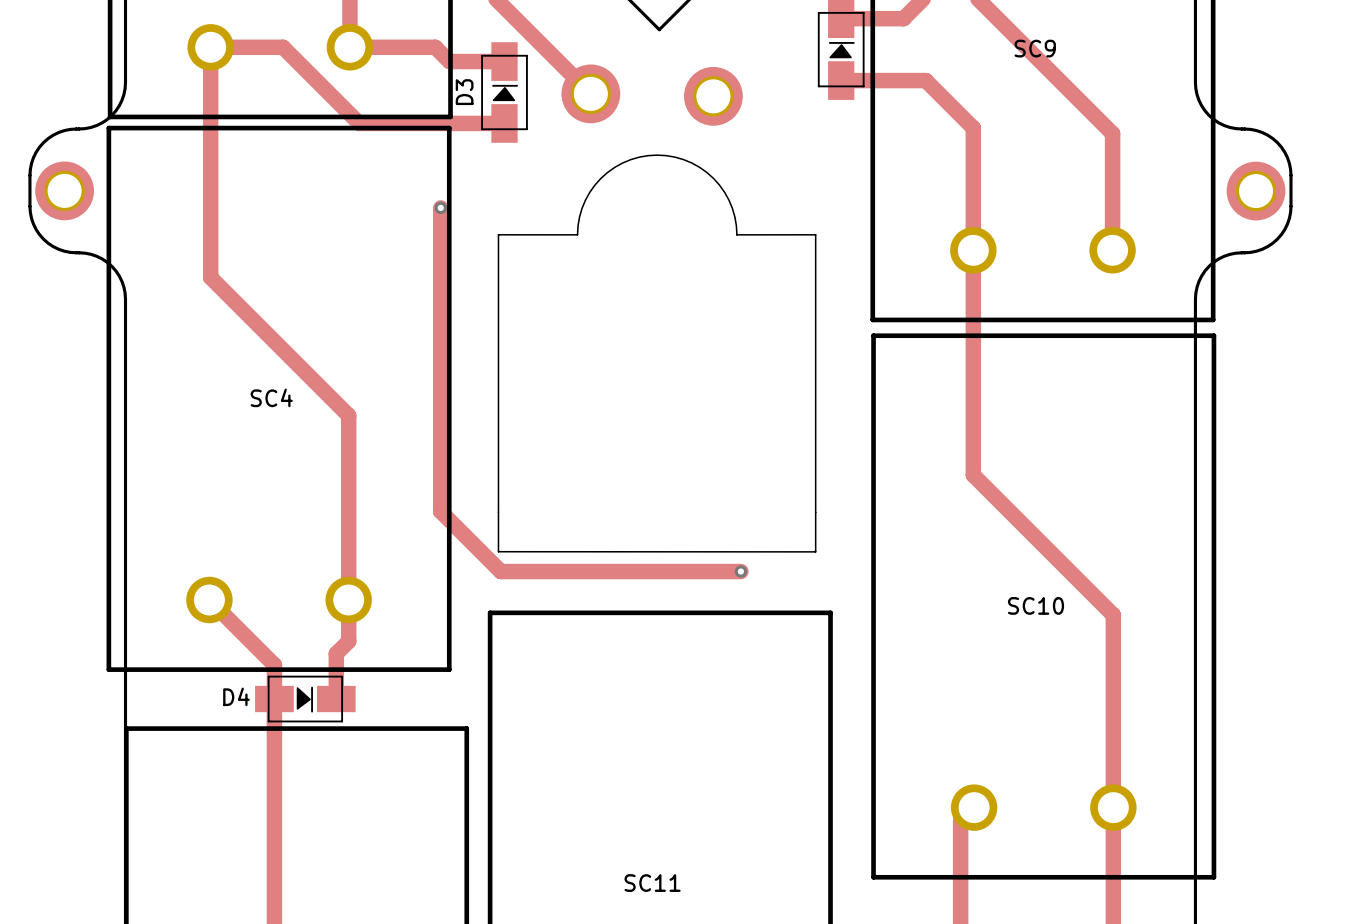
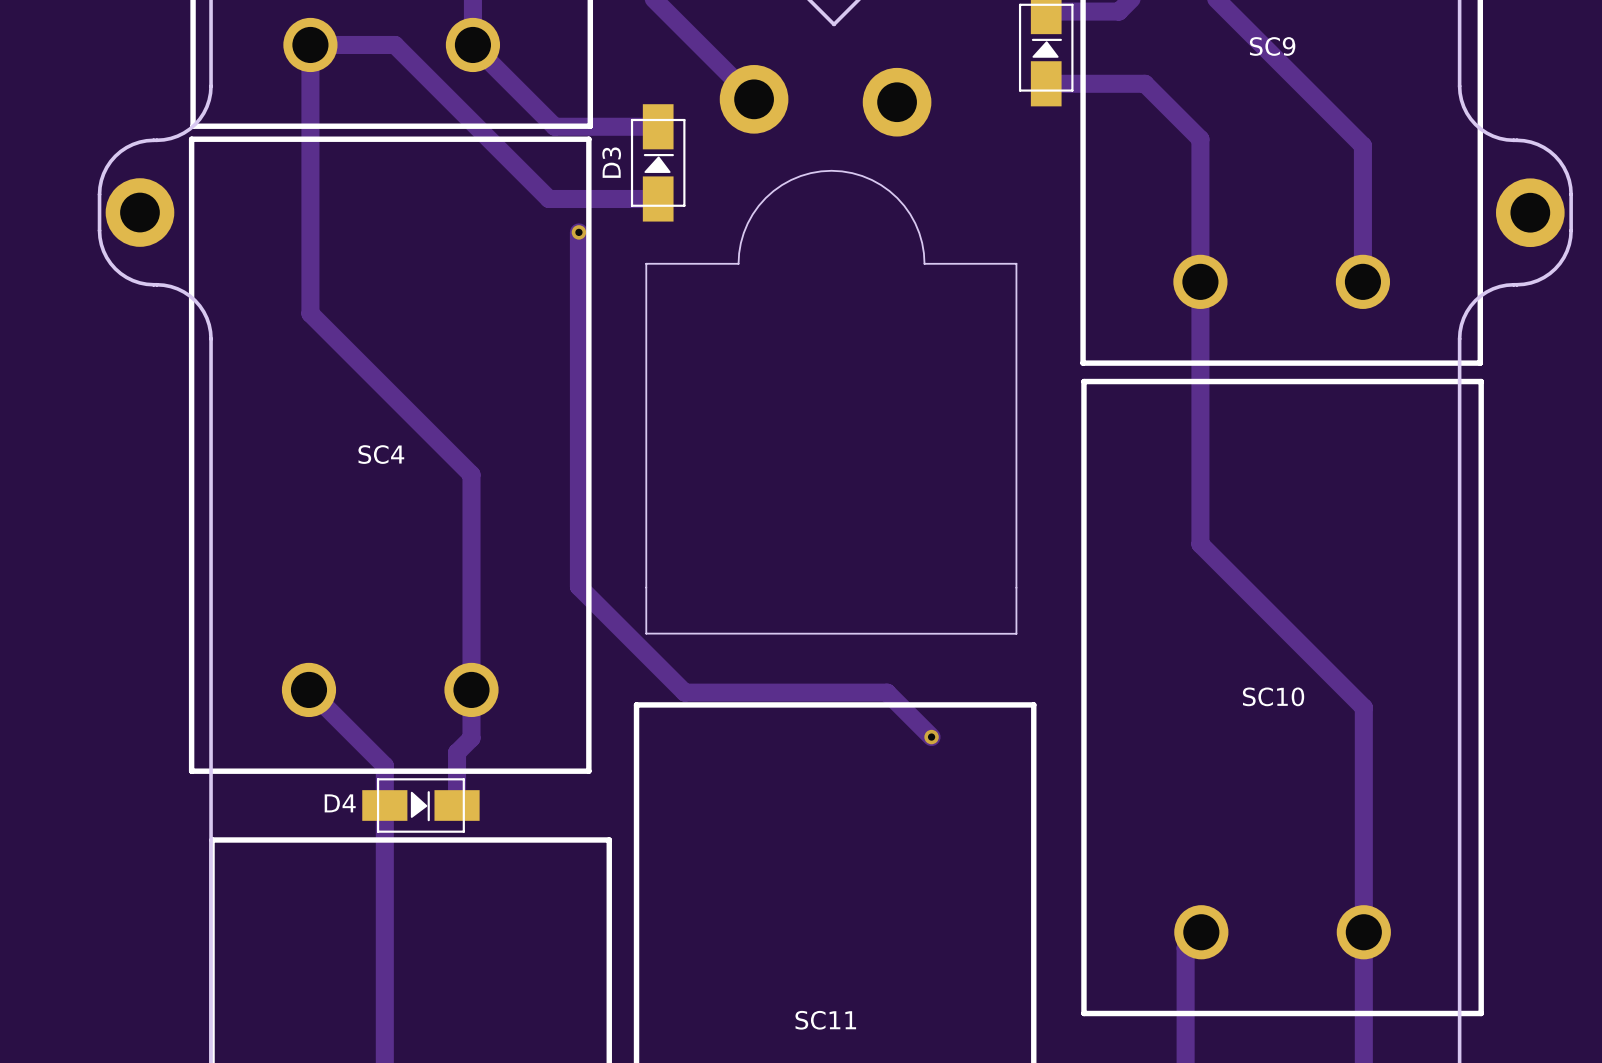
track: (349, 47) (435, 47) (449, 61) (504, 61) -> (472, 44) (554, 126) (658, 126)
D3 position: (504, 92) -> (658, 162)
track: (359, 123) (504, 123) -> (483, 133) (548, 198) (658, 198)
track: (500, 571) (740, 571) -> (648, 656) (684, 692) (887, 692) (931, 737)
via position: (740, 571) -> (931, 737)

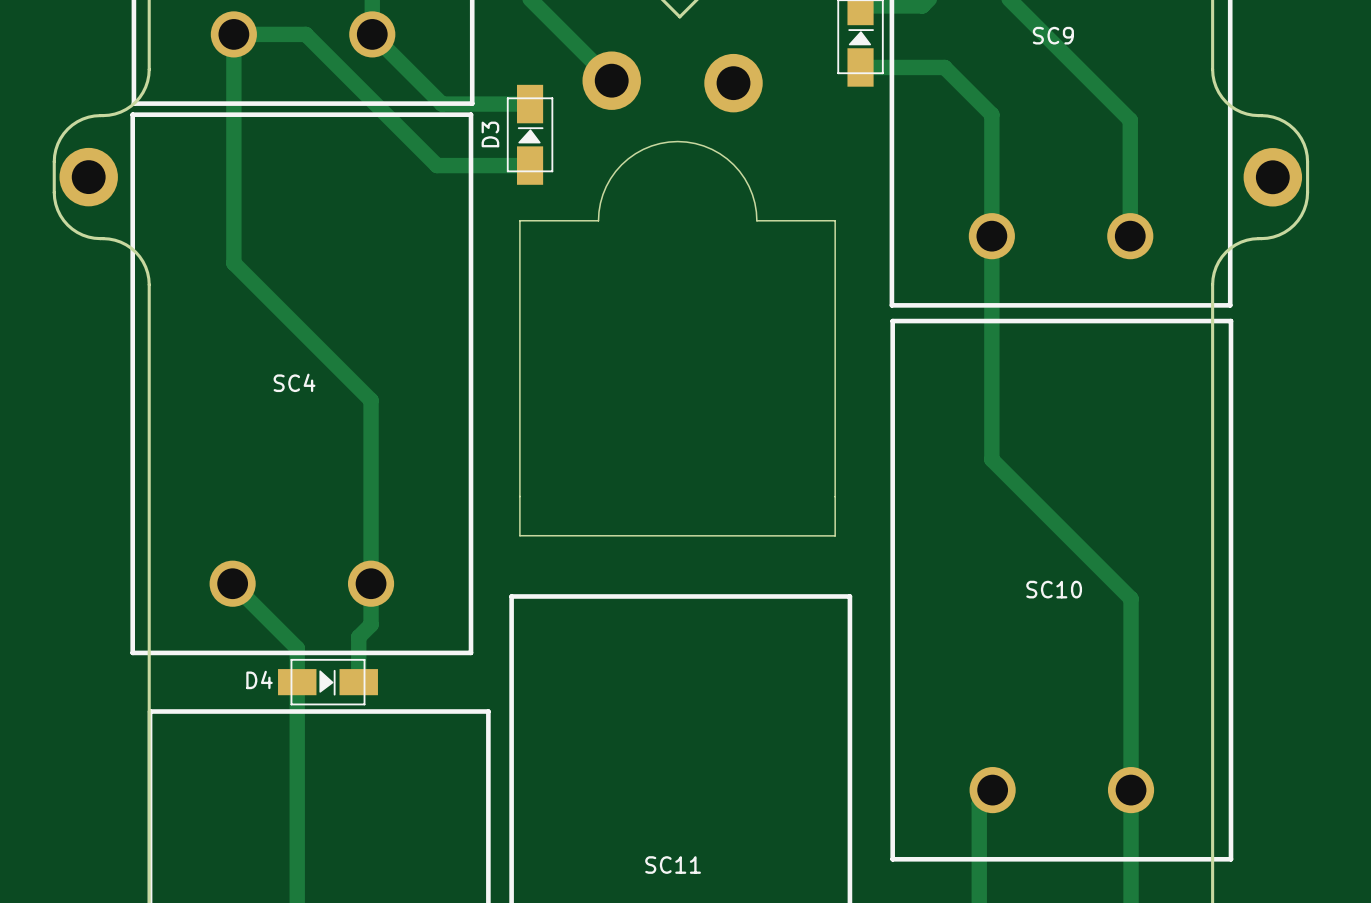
track: (578, 232) (578, 586) (684, 692) (887, 692) (931, 737) -> none
via: (578, 232) -> none
via: (931, 737) -> none

